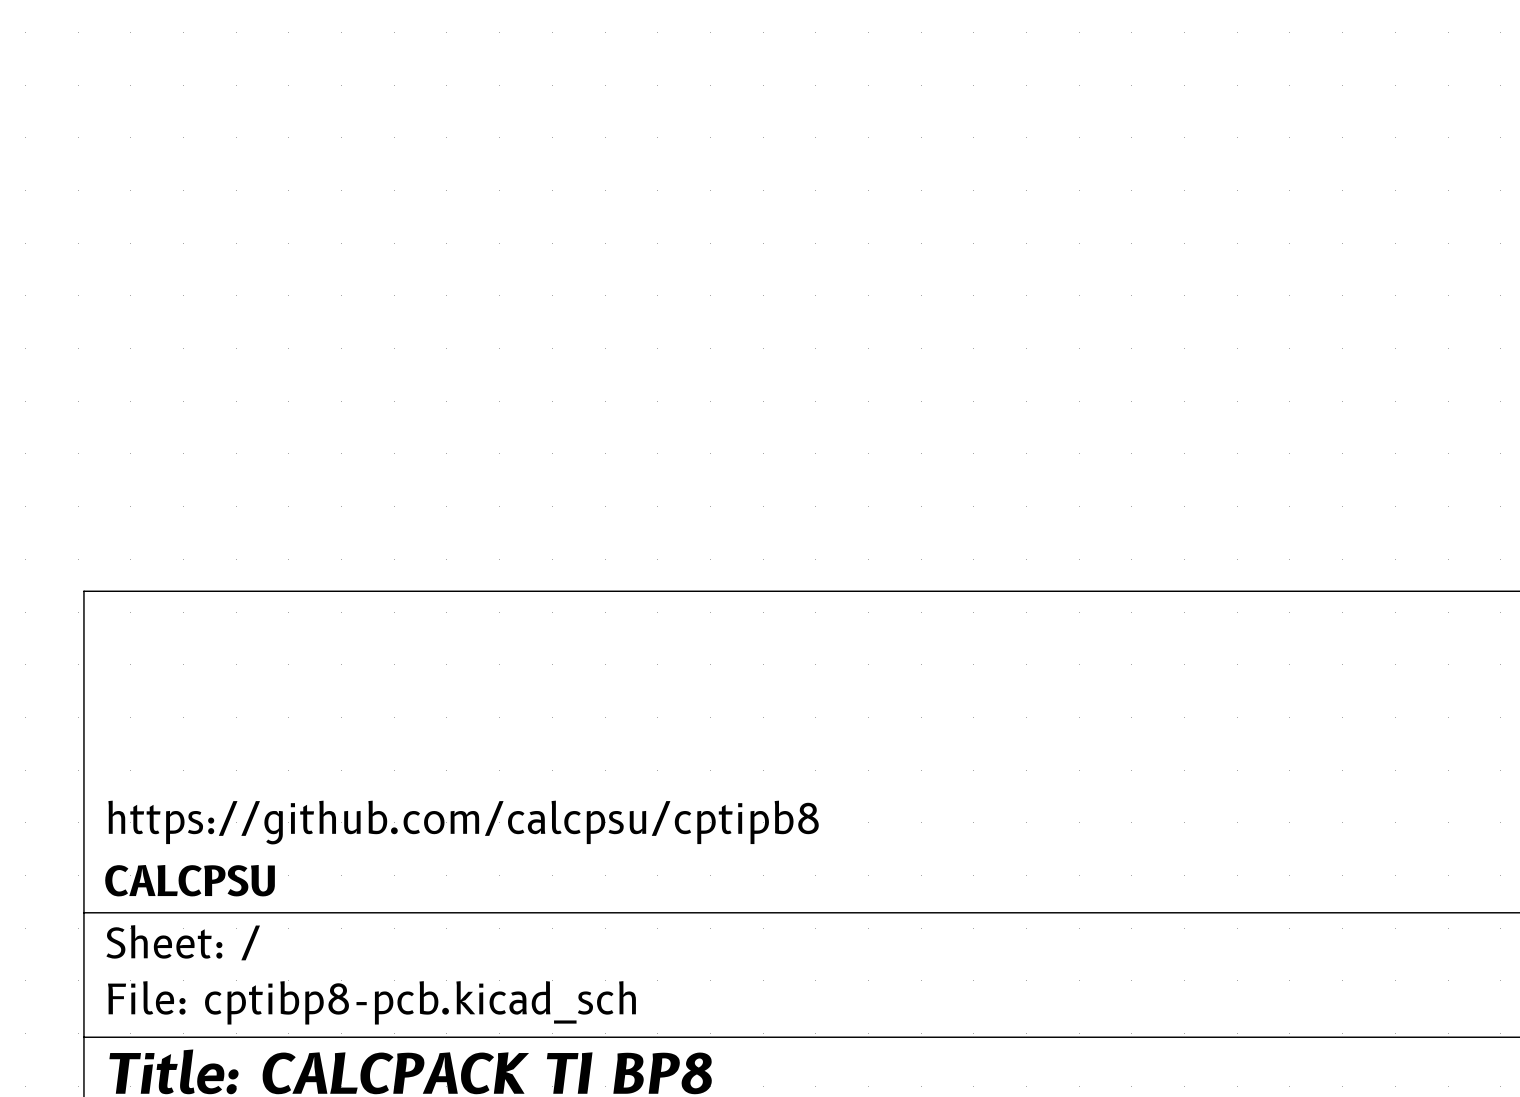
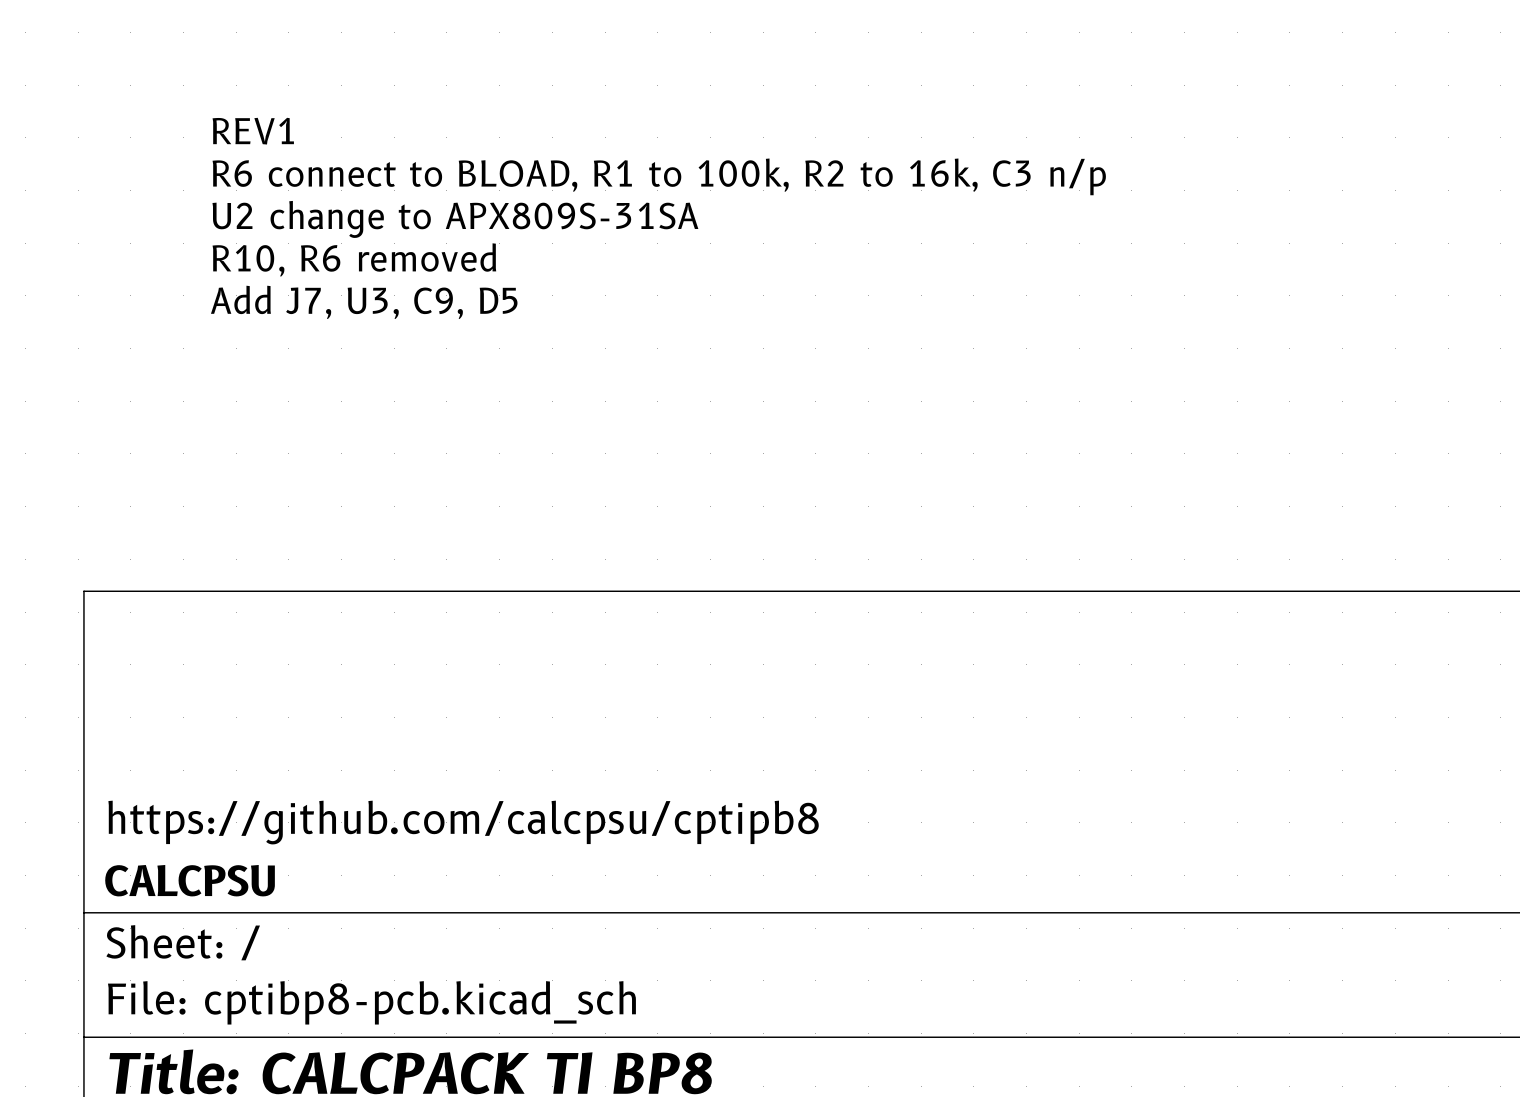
text: none -> REV1 (253, 131)
text: none -> R6 connect to BLOAD, R1 to 100k, R2 to 16k, C3 n/p (659, 176)
text: none -> U2 change to APX809S-31SA (455, 219)
text: none -> R10, R6 removed (354, 259)
text: none -> Add J7, U3, C9, D5 (364, 302)

